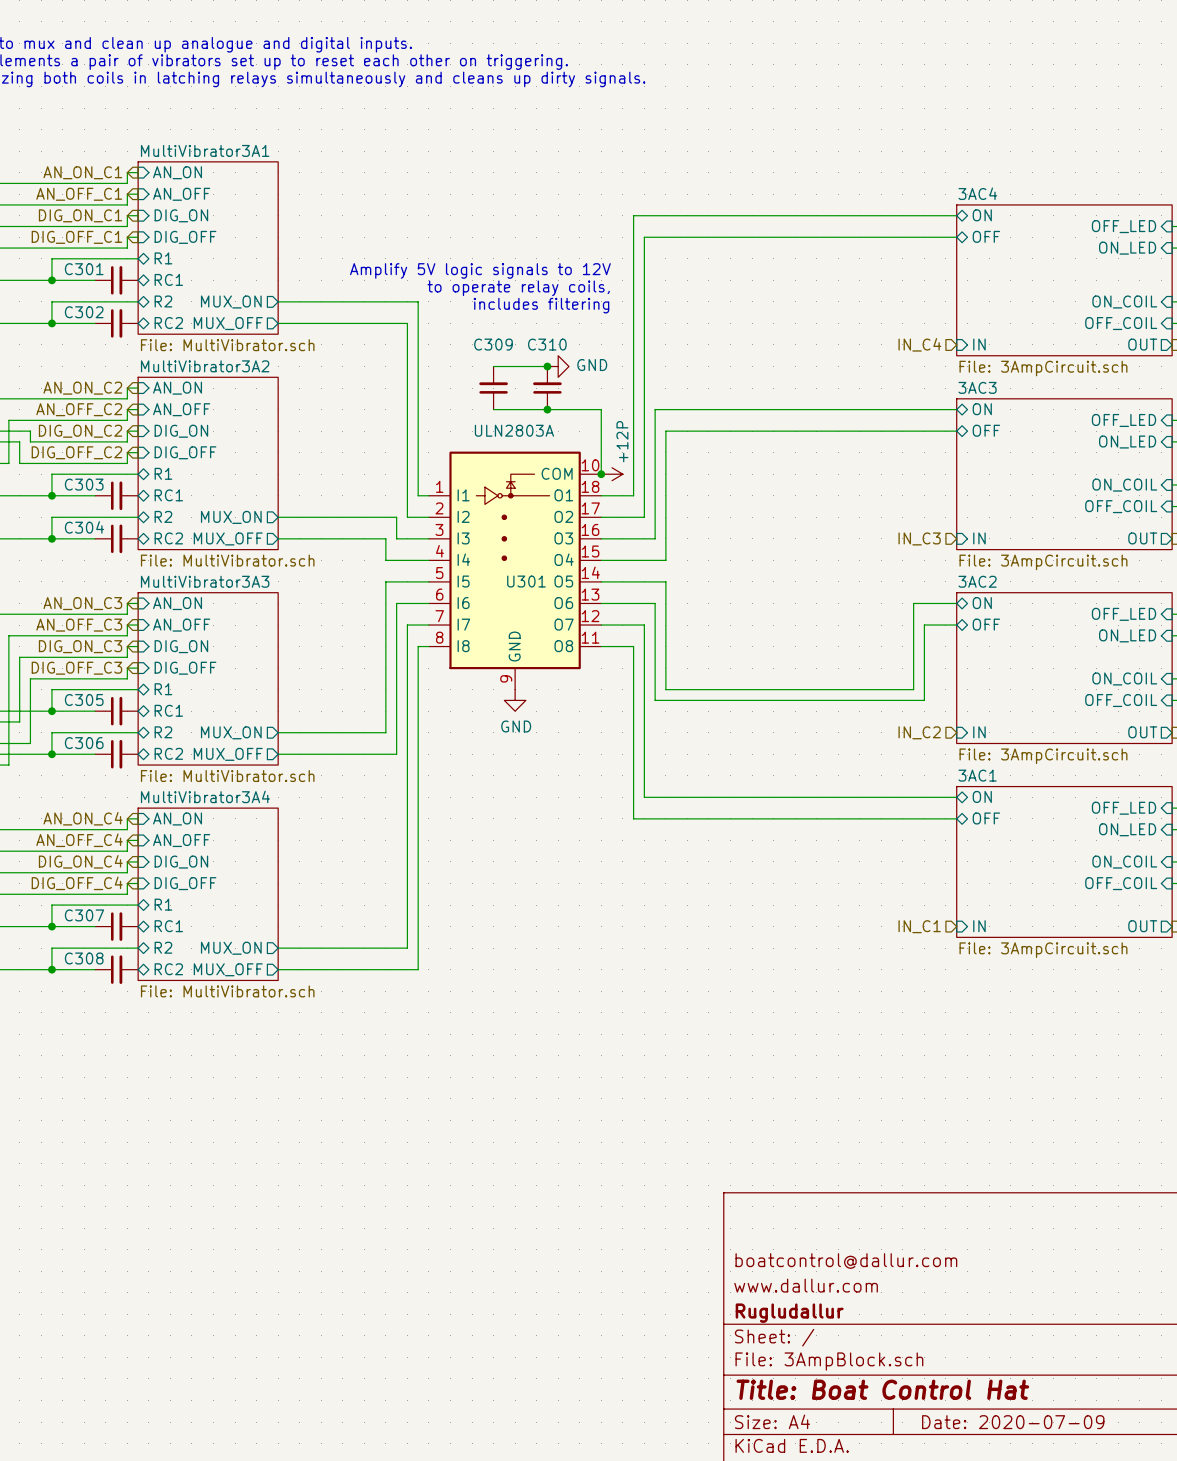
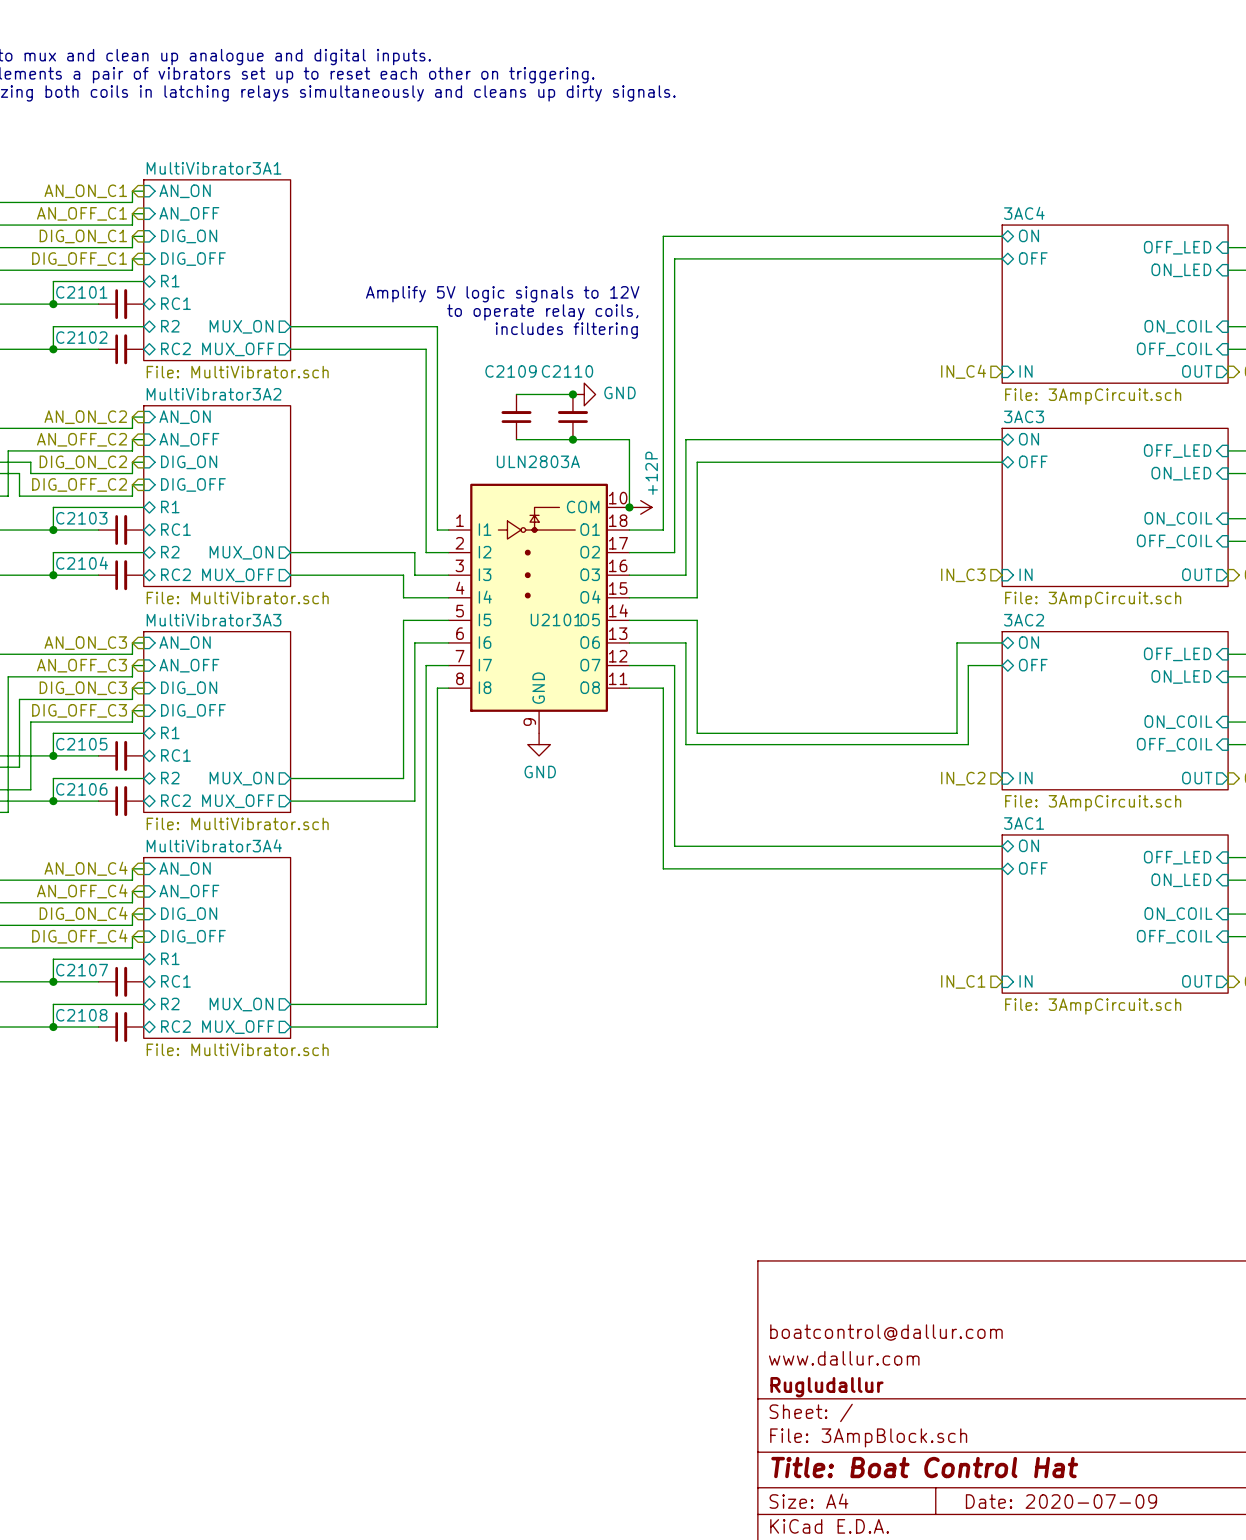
C301 name: C301 (84, 269) -> C2101 (81, 292)
C302 name: C302 (84, 312) -> C2102 (81, 337)
C309 name: C309 (493, 344) -> C2109 (511, 371)
C310 name: C310 (547, 344) -> C2110 (567, 371)
C303 name: C303 (84, 484) -> C2103 (81, 518)
C304 name: C304 (84, 527) -> C2104 (82, 563)
U301 name: U301 (526, 581) -> U2101 (556, 619)
C305 name: C305 (84, 700) -> C2105 (81, 744)
C306 name: C306 (84, 743) -> C2106 (81, 789)
C307 name: C307 (84, 915) -> C2107 (82, 970)
C308 name: C308 (84, 958) -> C2108 (81, 1015)

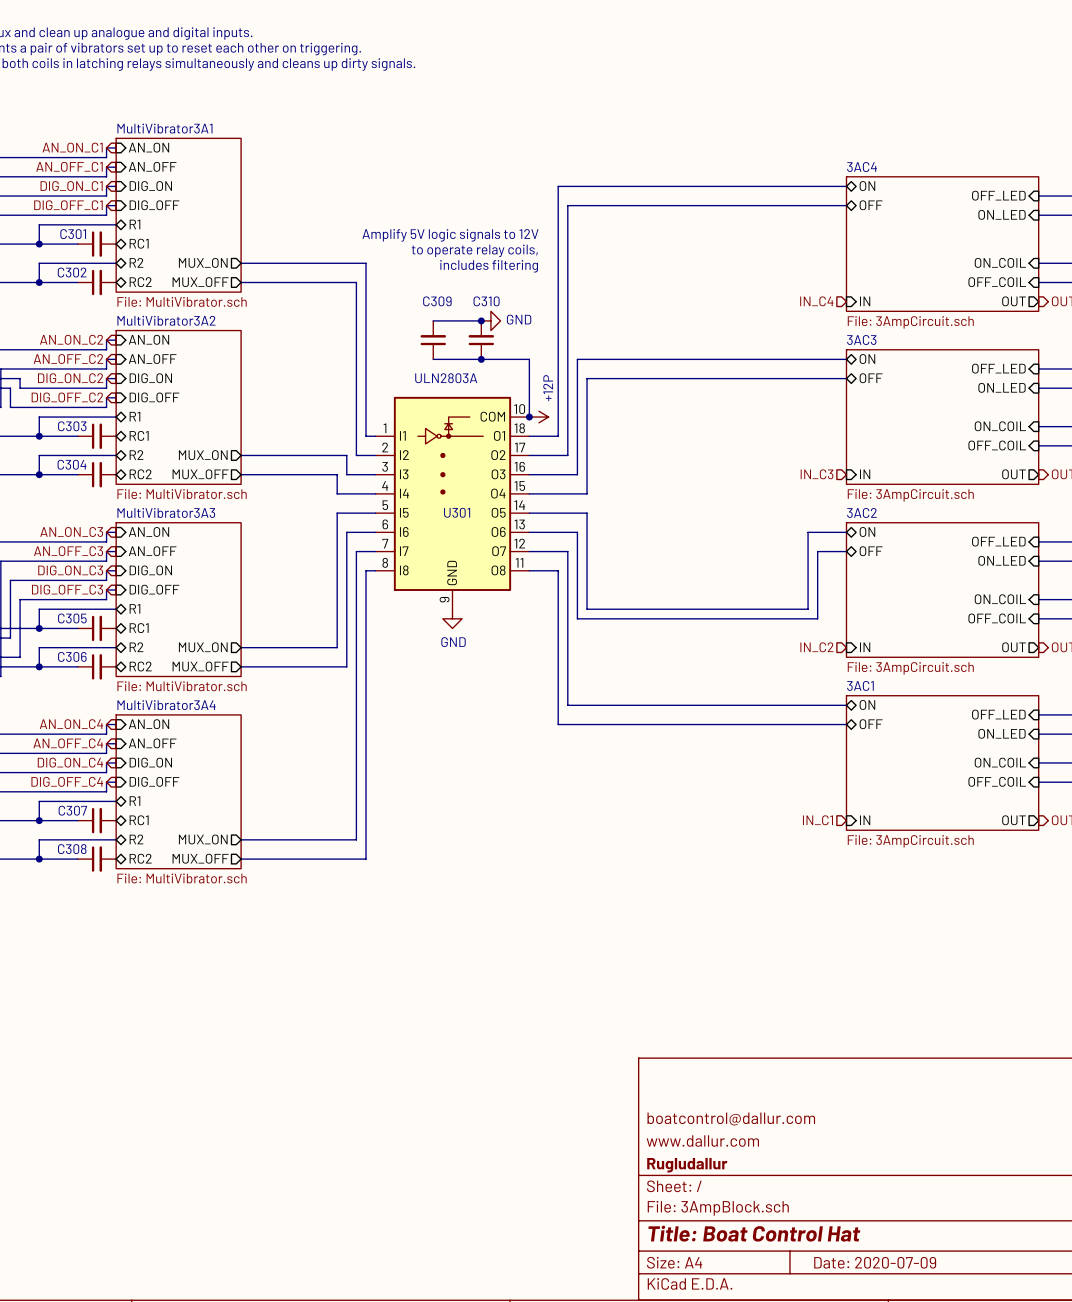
C2101 name: C2101 (81, 292) -> C301 (73, 234)
C2102 name: C2102 (81, 337) -> C302 (72, 272)
C2109 name: C2109 (511, 371) -> C309 (437, 301)
C2110 name: C2110 (567, 371) -> C310 (486, 301)
C2103 name: C2103 (81, 518) -> C303 (72, 426)
C2104 name: C2104 (82, 563) -> C304 (72, 464)
U2101 name: U2101 (556, 619) -> U301 (457, 512)
C2105 name: C2105 (81, 744) -> C305 (72, 618)
C2106 name: C2106 (81, 789) -> C306 (72, 656)
C2107 name: C2107 (82, 970) -> C307 (72, 810)
C2108 name: C2108 (81, 1015) -> C308 (72, 849)

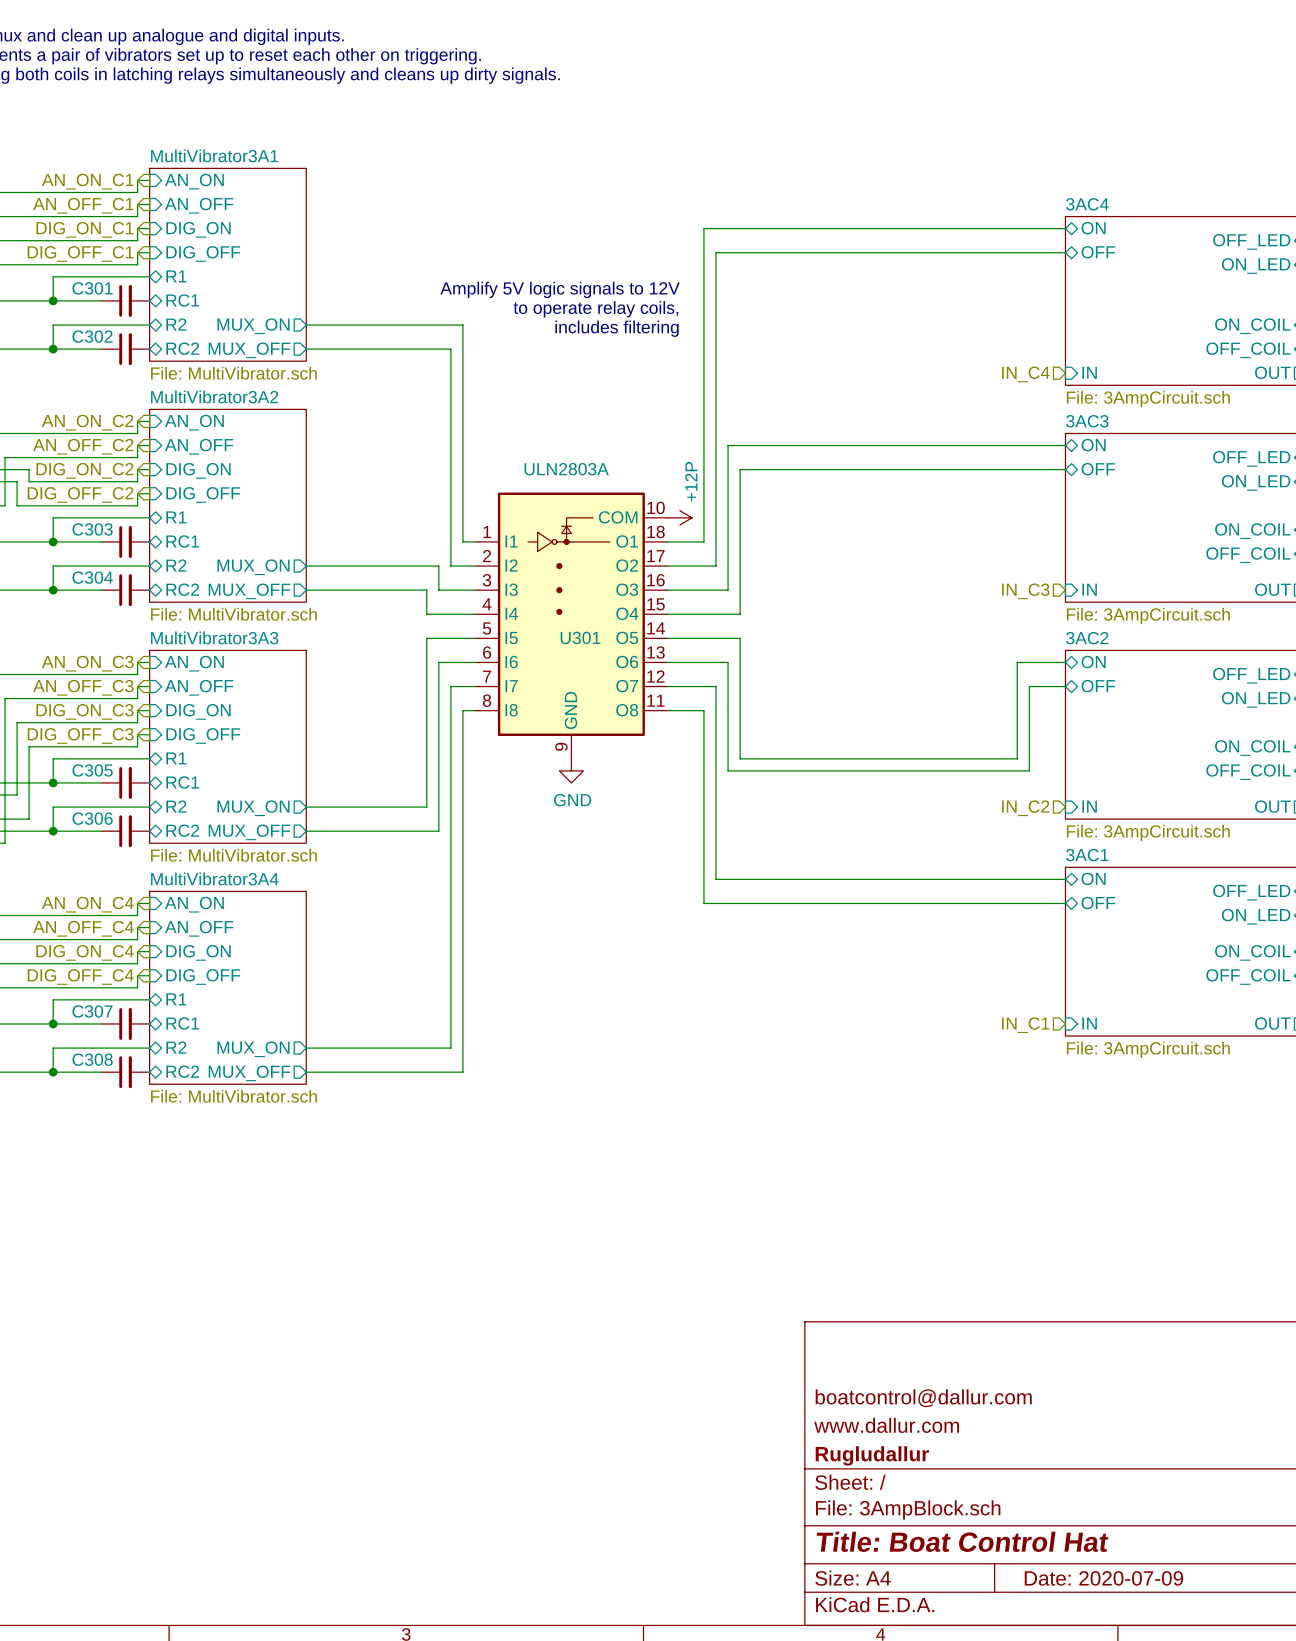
wire: (433, 320) (481, 320) -> none
junction: (481, 320) -> none
power symbol: GND (490, 320) -> none
C309: (433, 340) -> none
C310: (481, 340) -> none
wire: (433, 359) (529, 359) (529, 417) -> none
junction: (481, 359) -> none
junction: (529, 417) -> none

